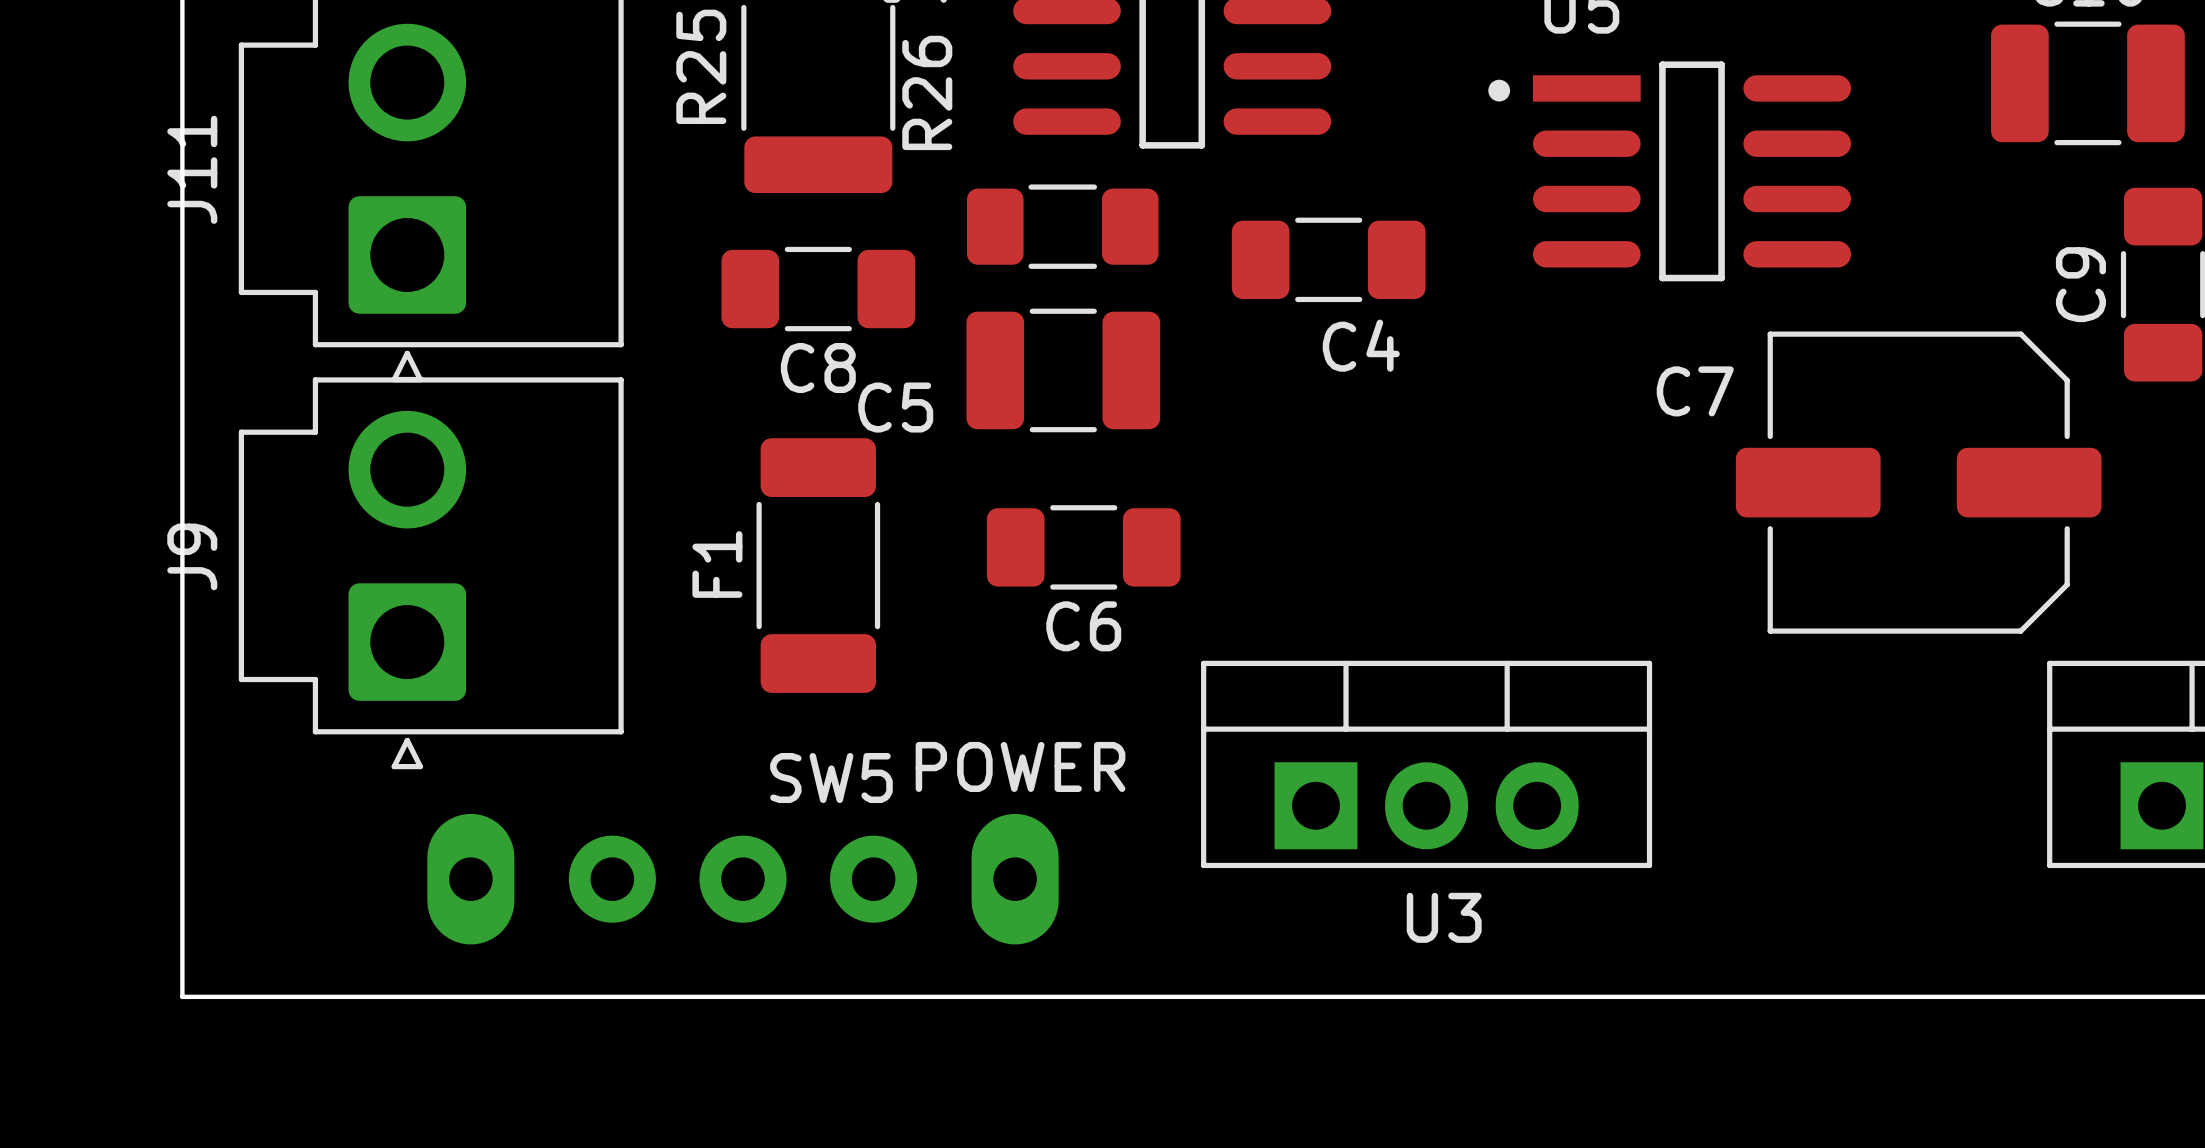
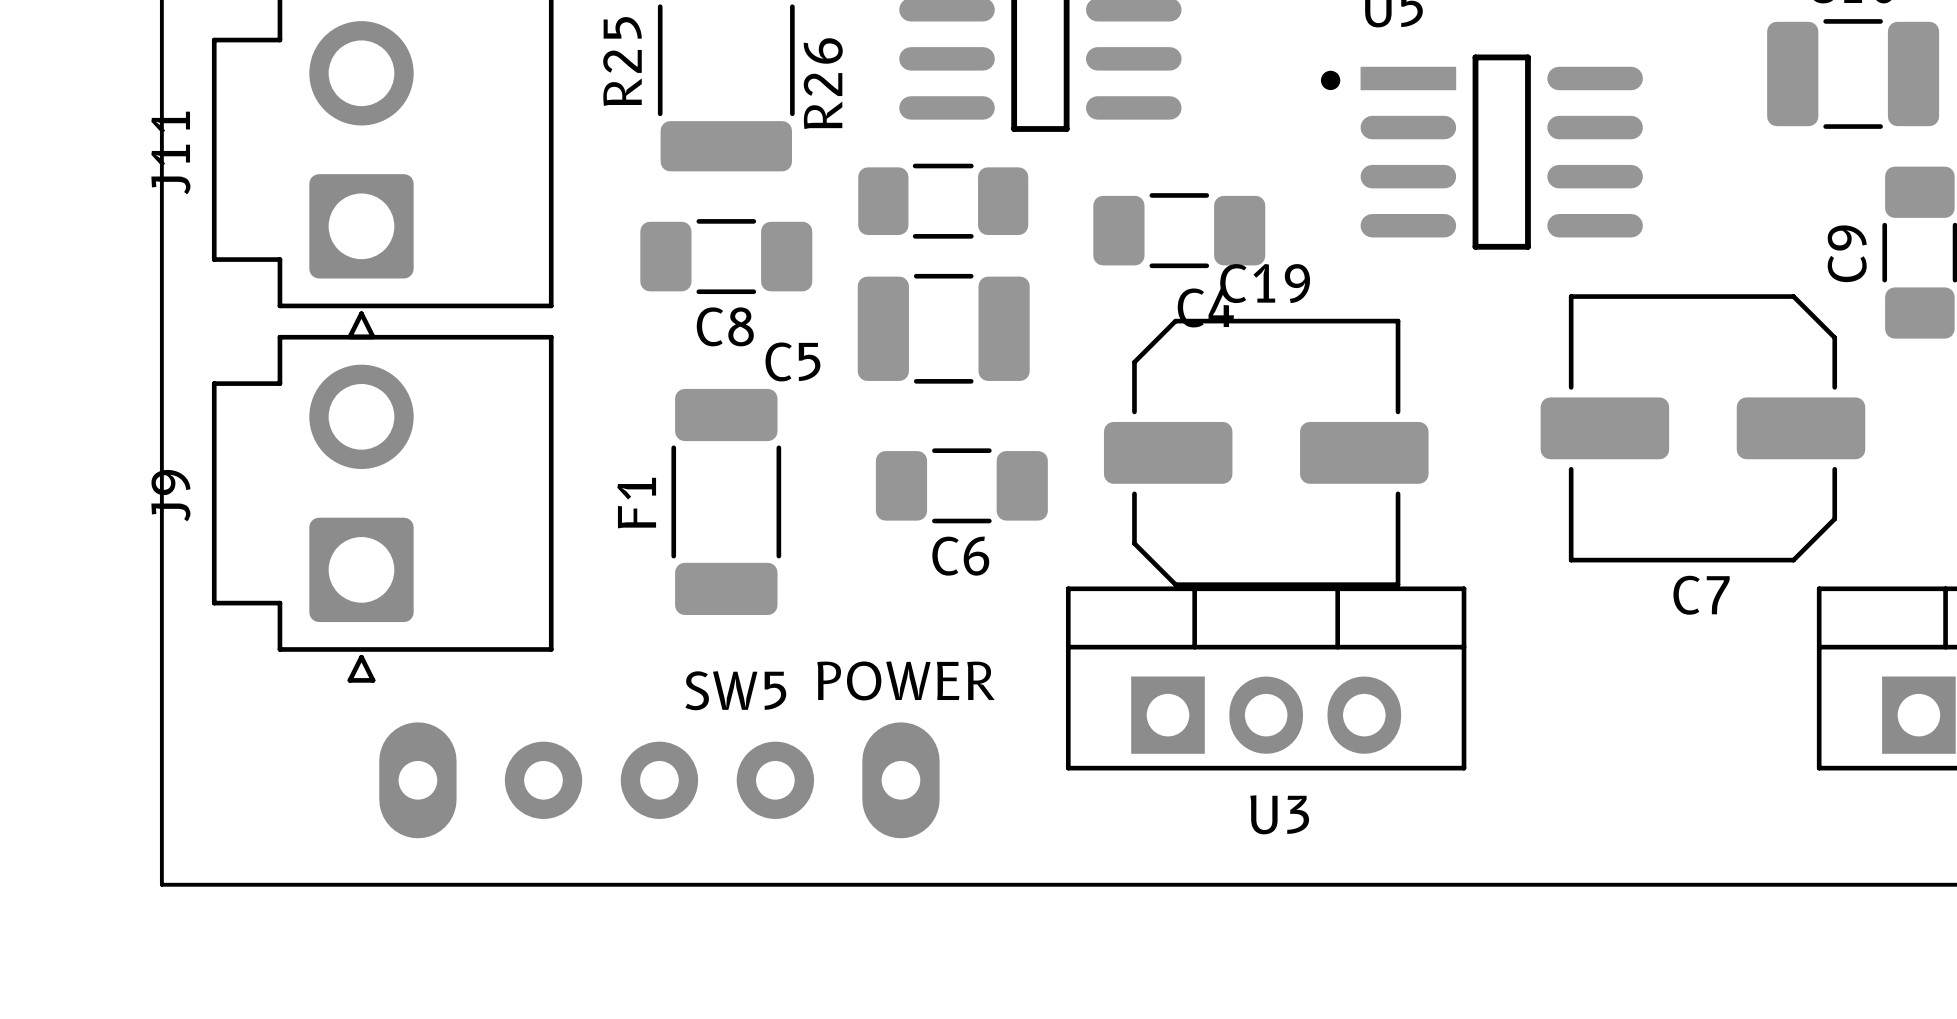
C7 name position: C7 (1695, 391) -> C7 (1701, 595)
C19: none -> (1266, 452)

